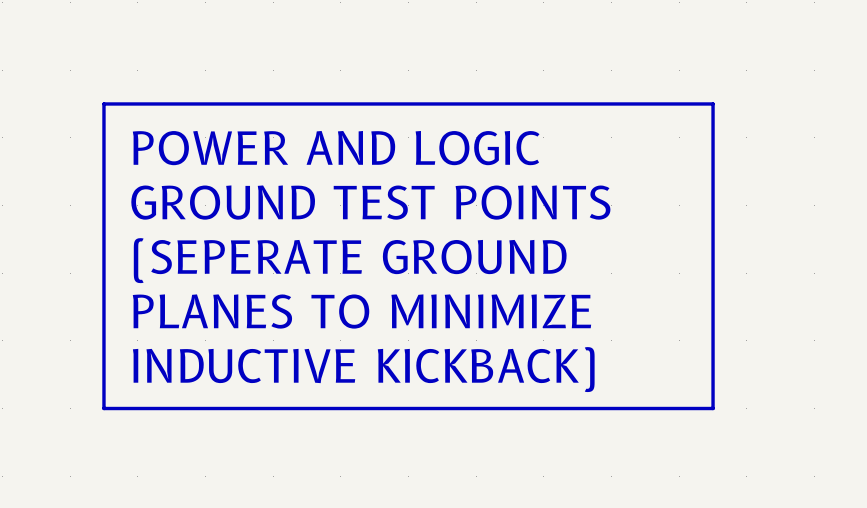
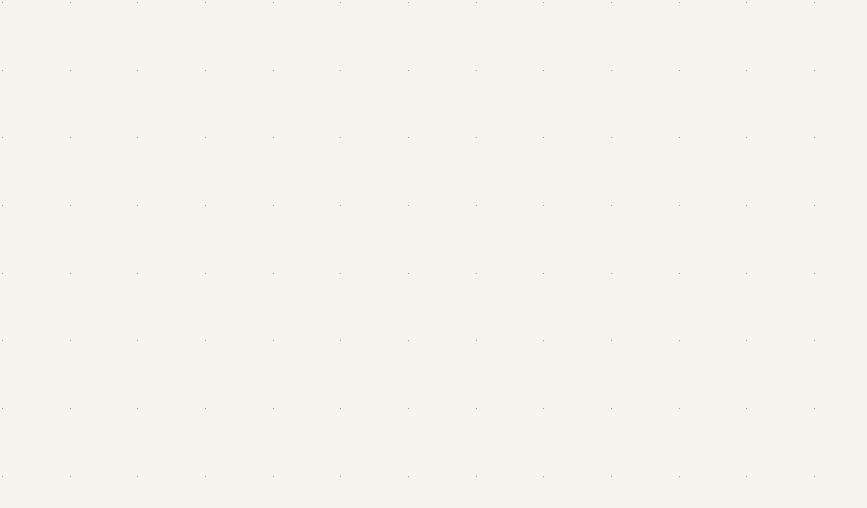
line: (103, 103) (713, 103) (713, 408) (103, 408) (103, 103) -> none
text: POWER AND LOGIC (336, 148) -> none
text: GROUND TEST POINTS (370, 202) -> none
text: (SEPERATE GROUND (350, 260) -> none
text: PLANES TO MINIMIZE (361, 311) -> none
text: INDUCTIVE KICKBACK) (363, 369) -> none

